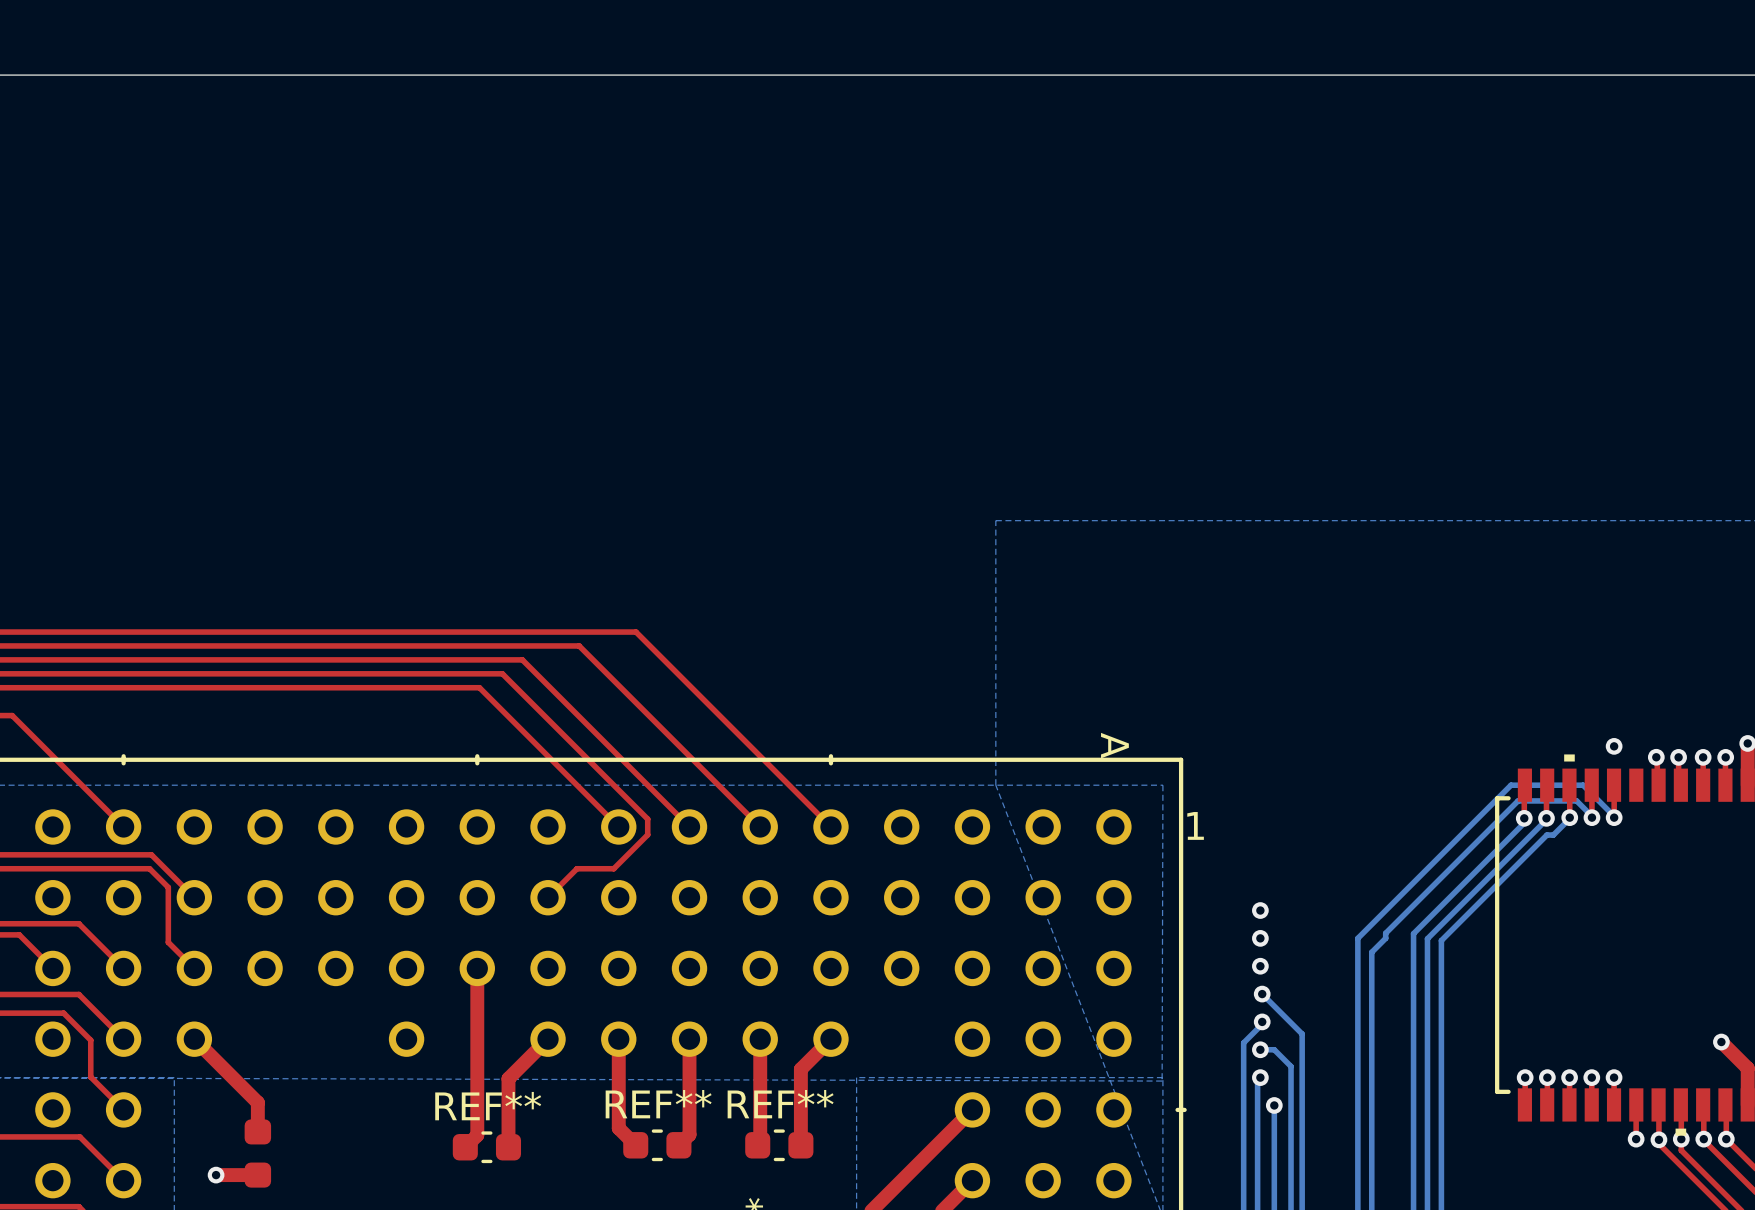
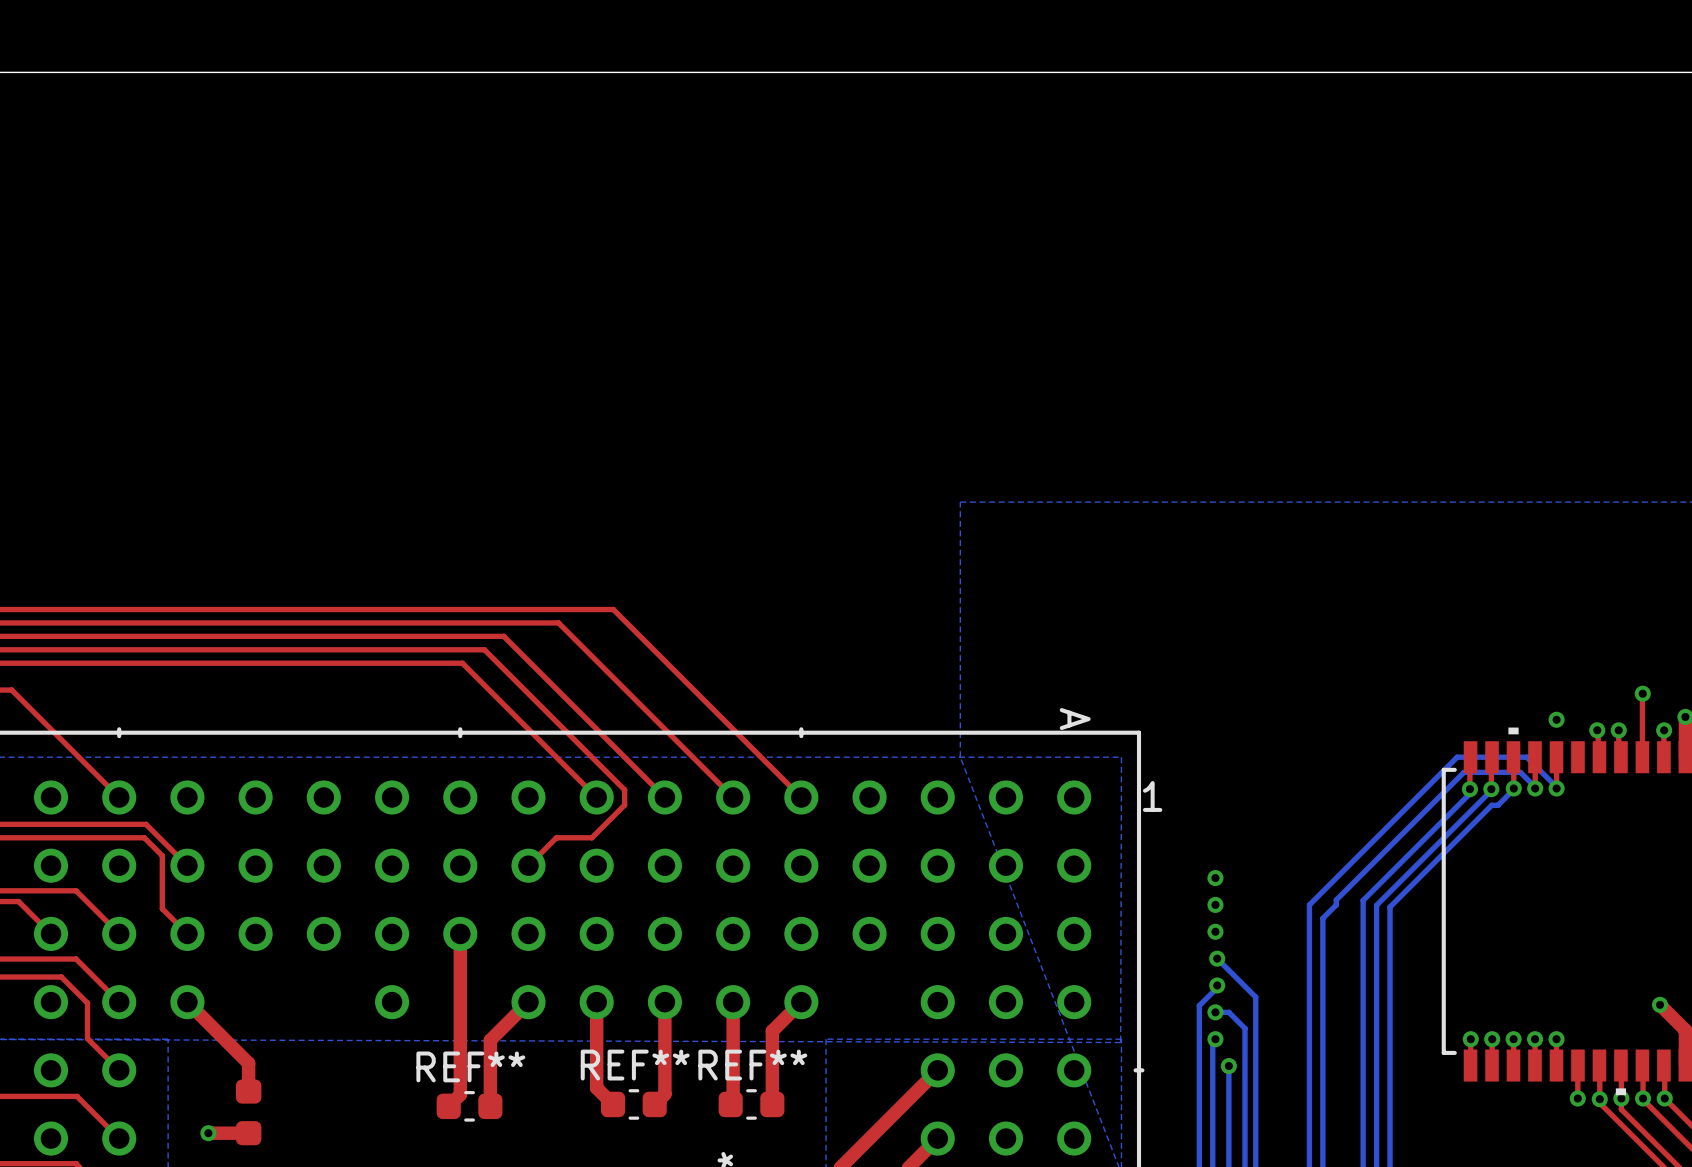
top track: none -> (1642, 694) (1642, 730)
via position: (1703, 757) -> (1642, 693)

